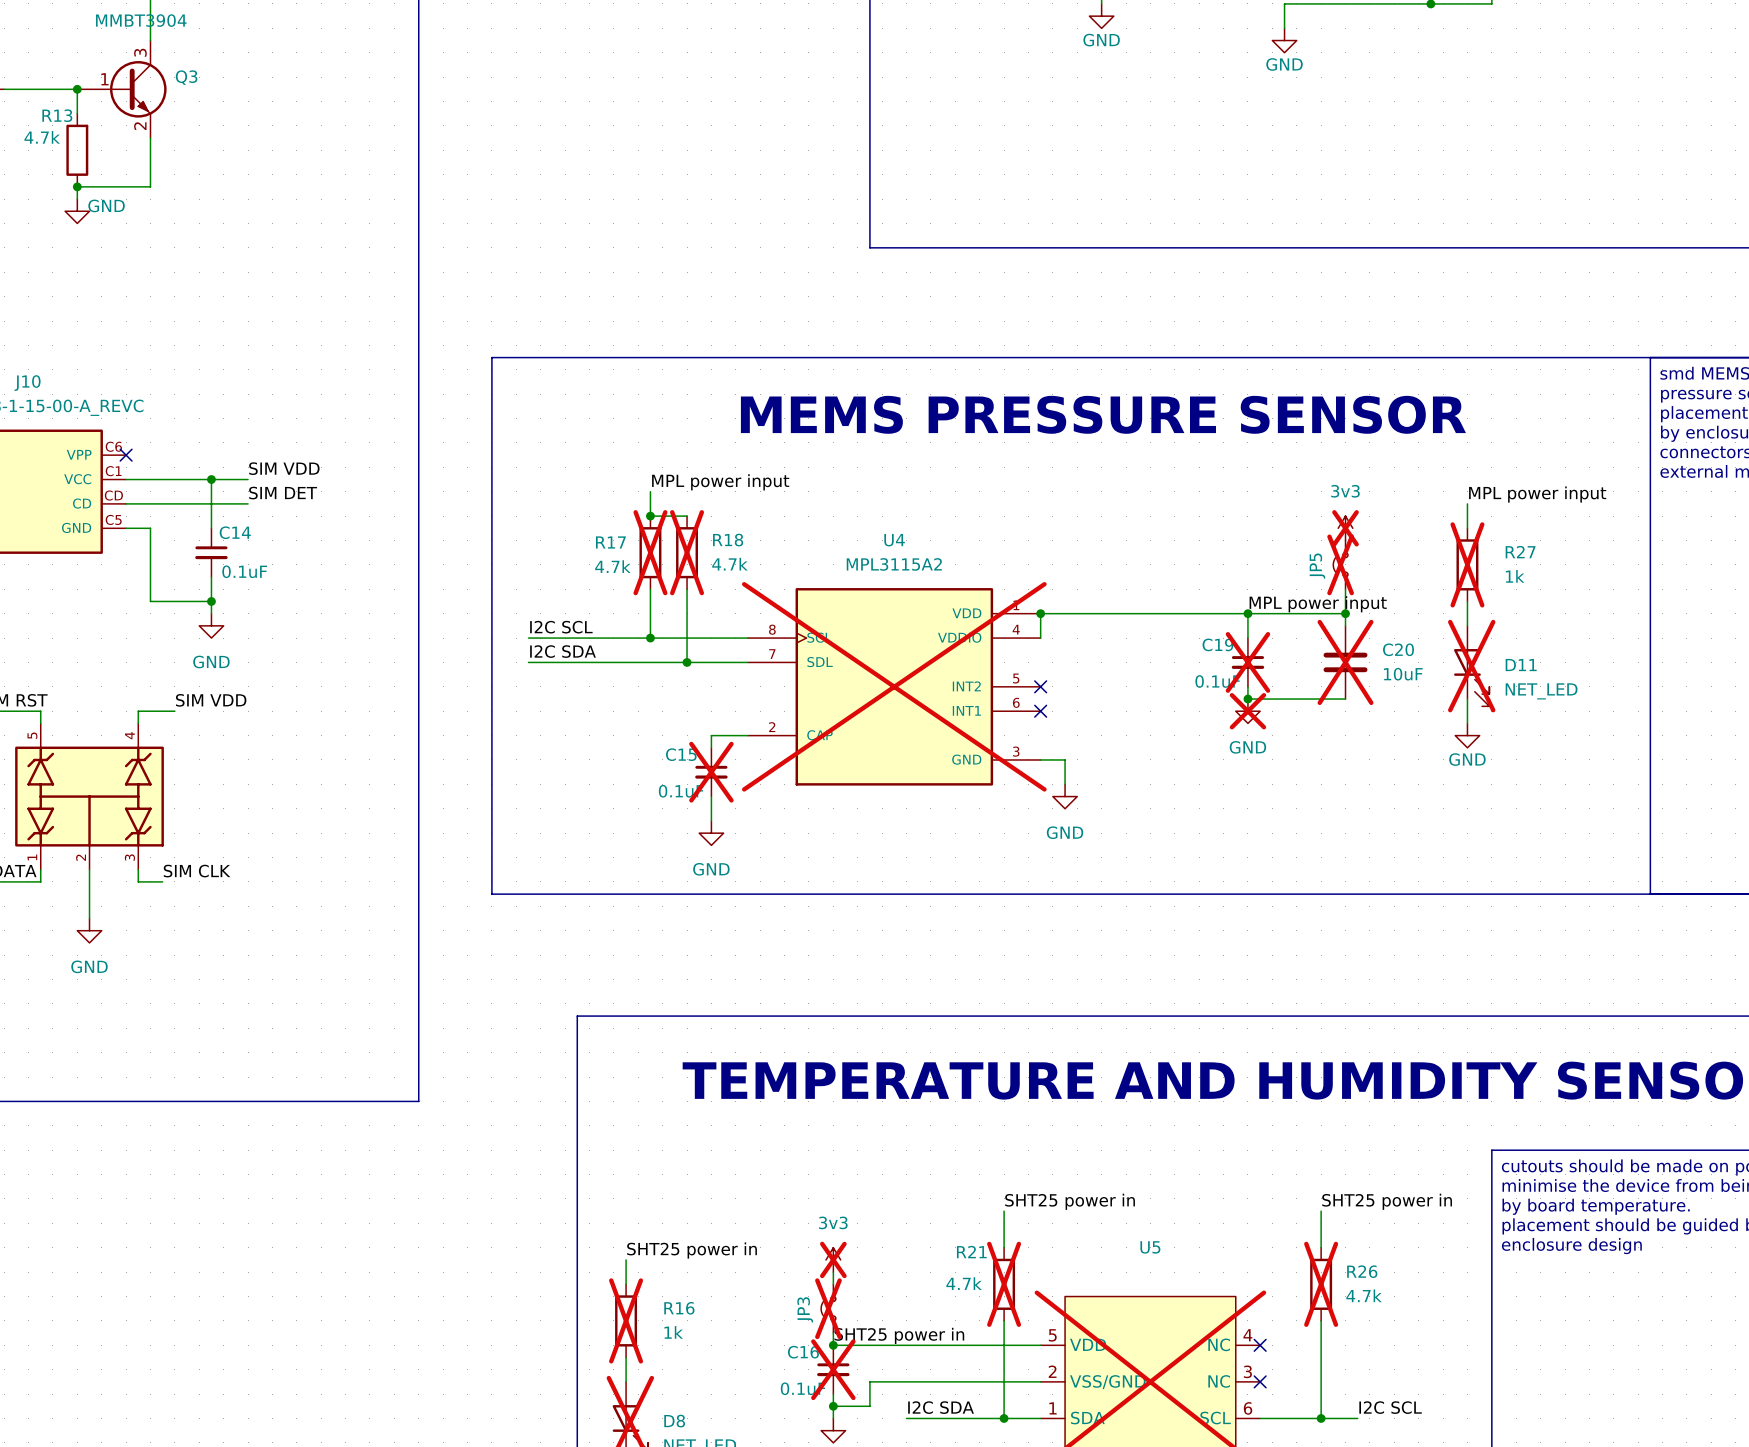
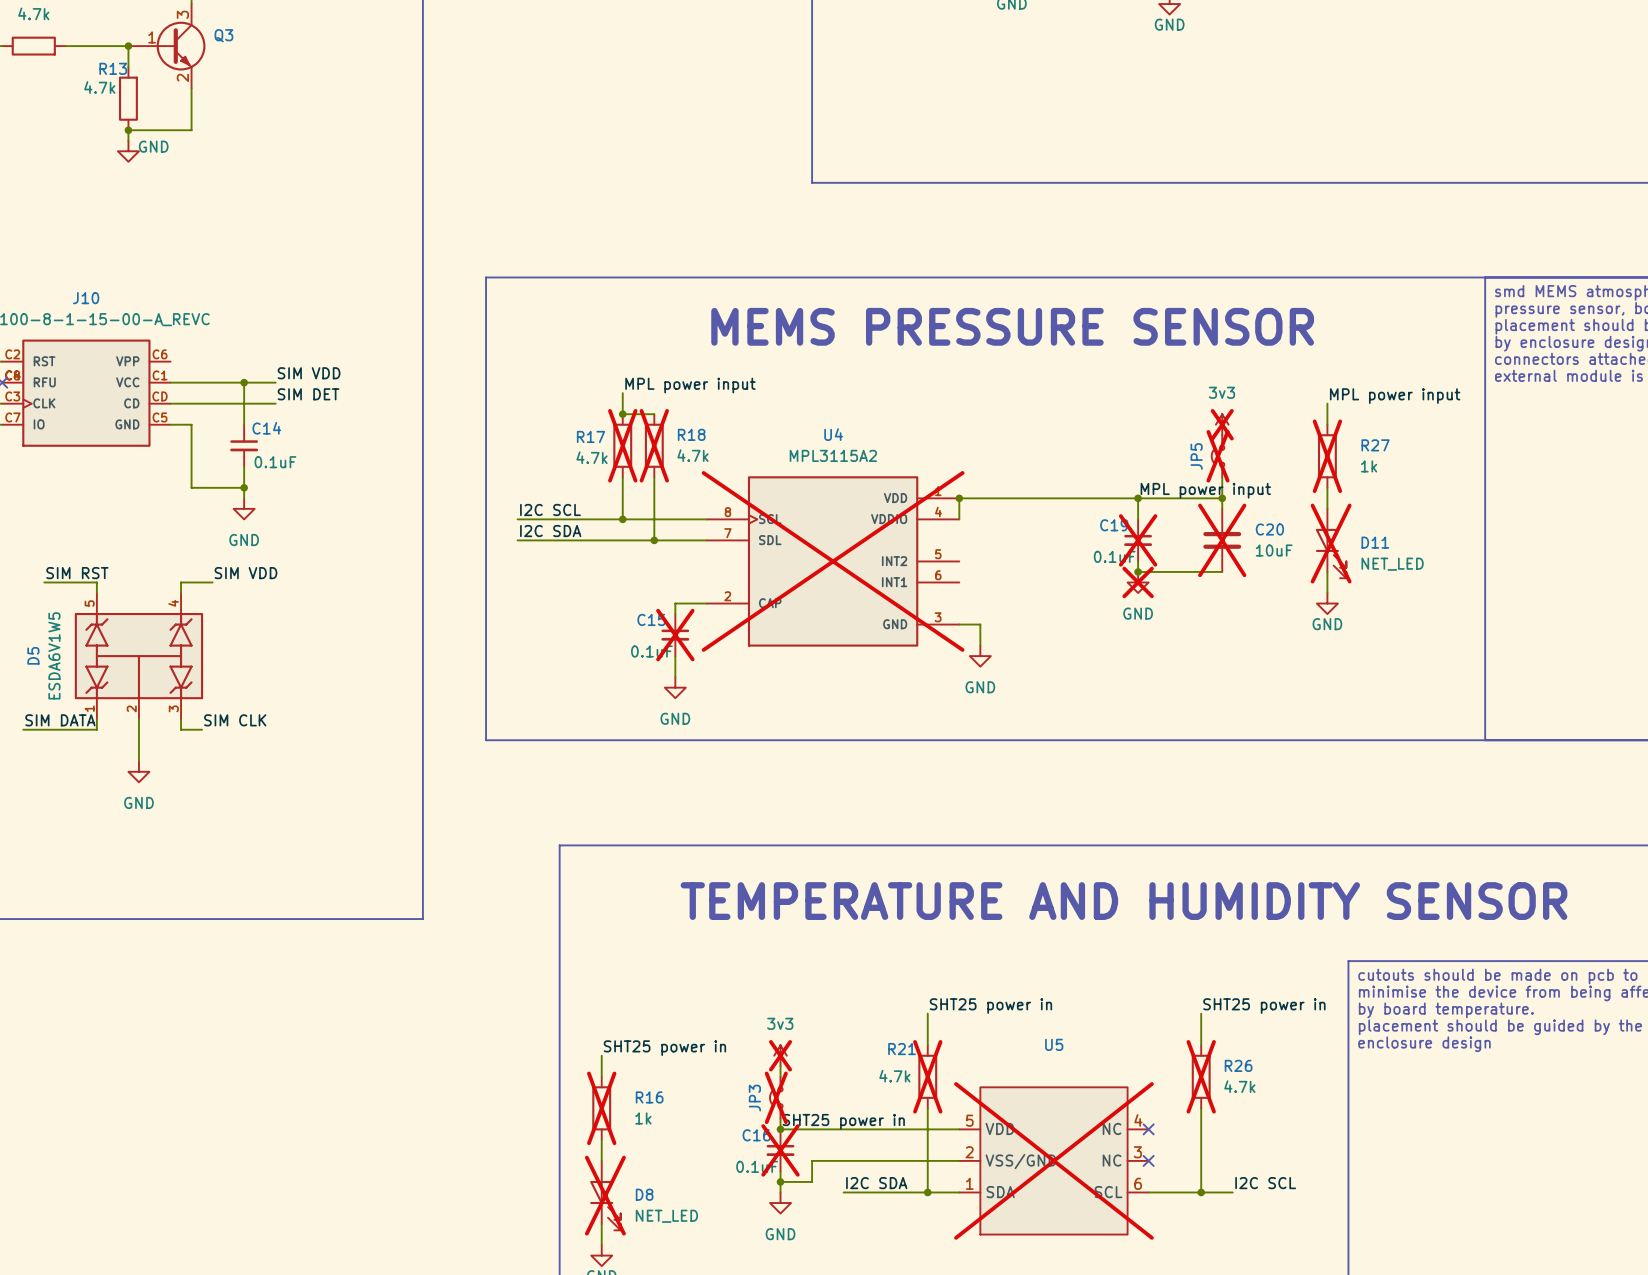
no-connect mark: (126, 455) -> none
no-connect mark: (1040, 686) -> none
no-connect mark: (1040, 711) -> none

